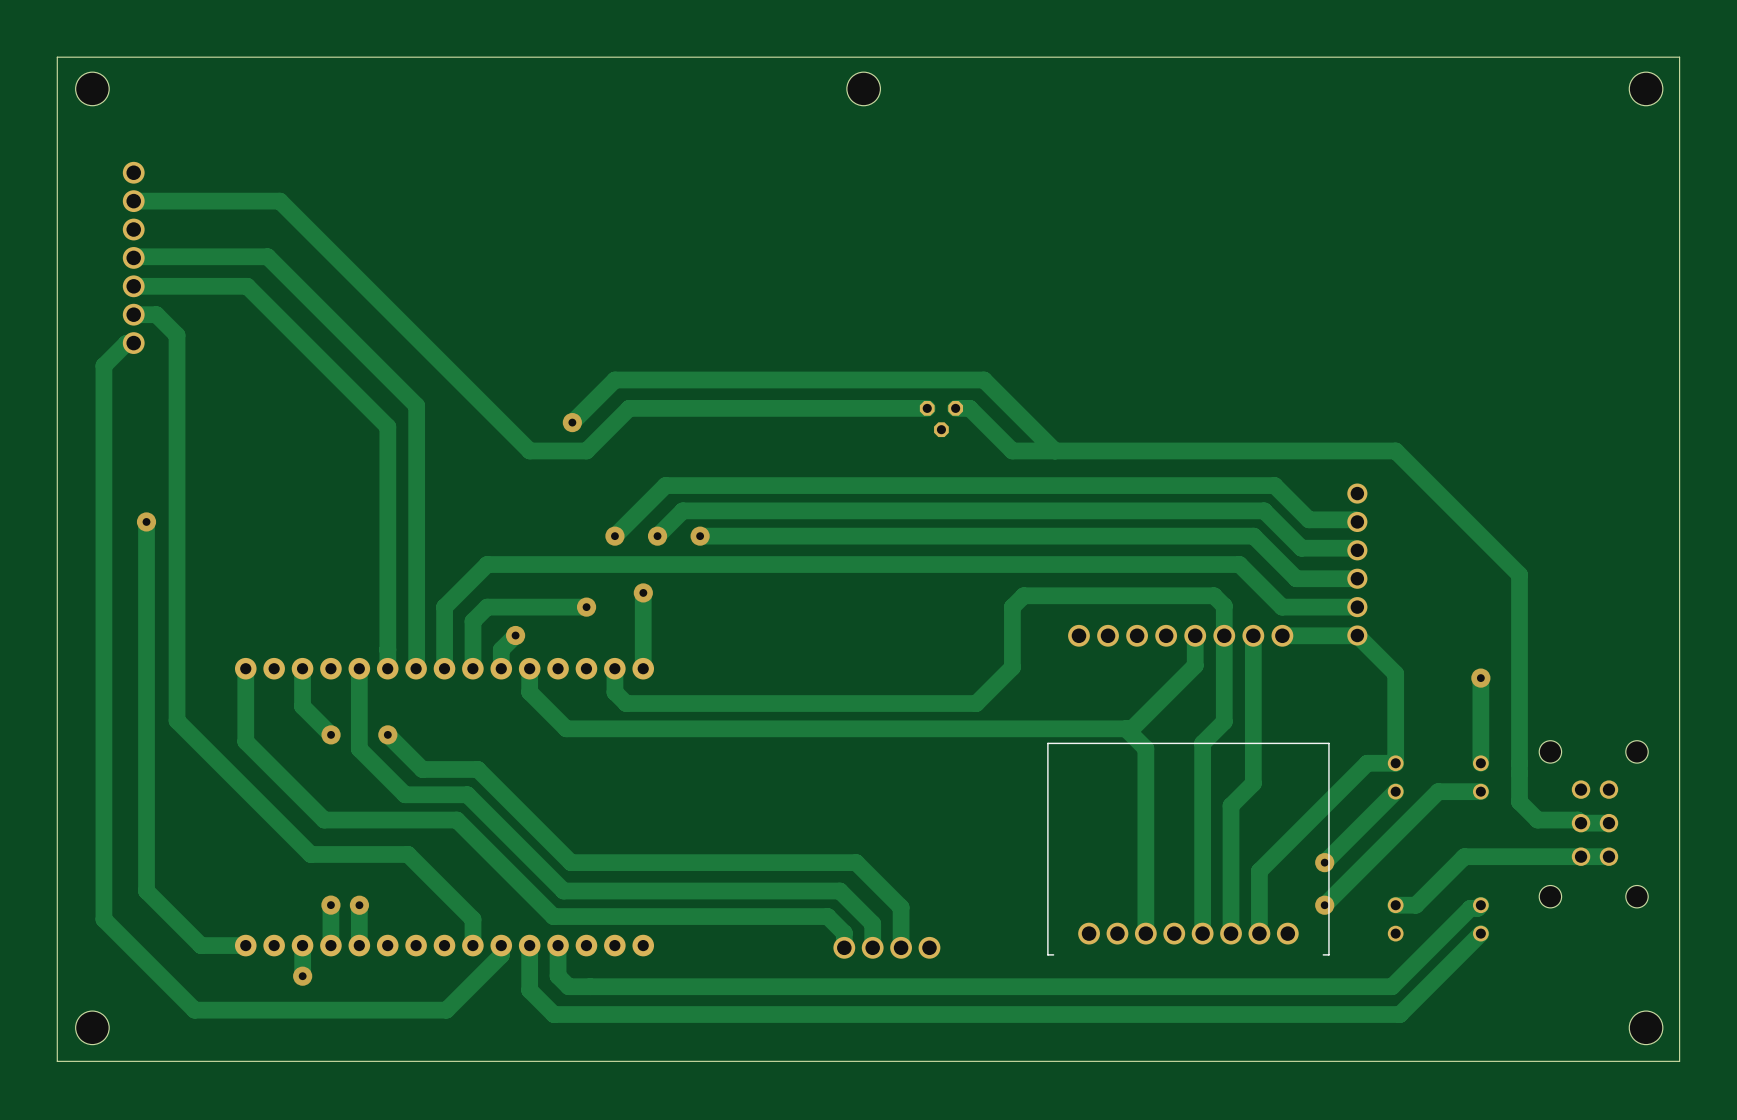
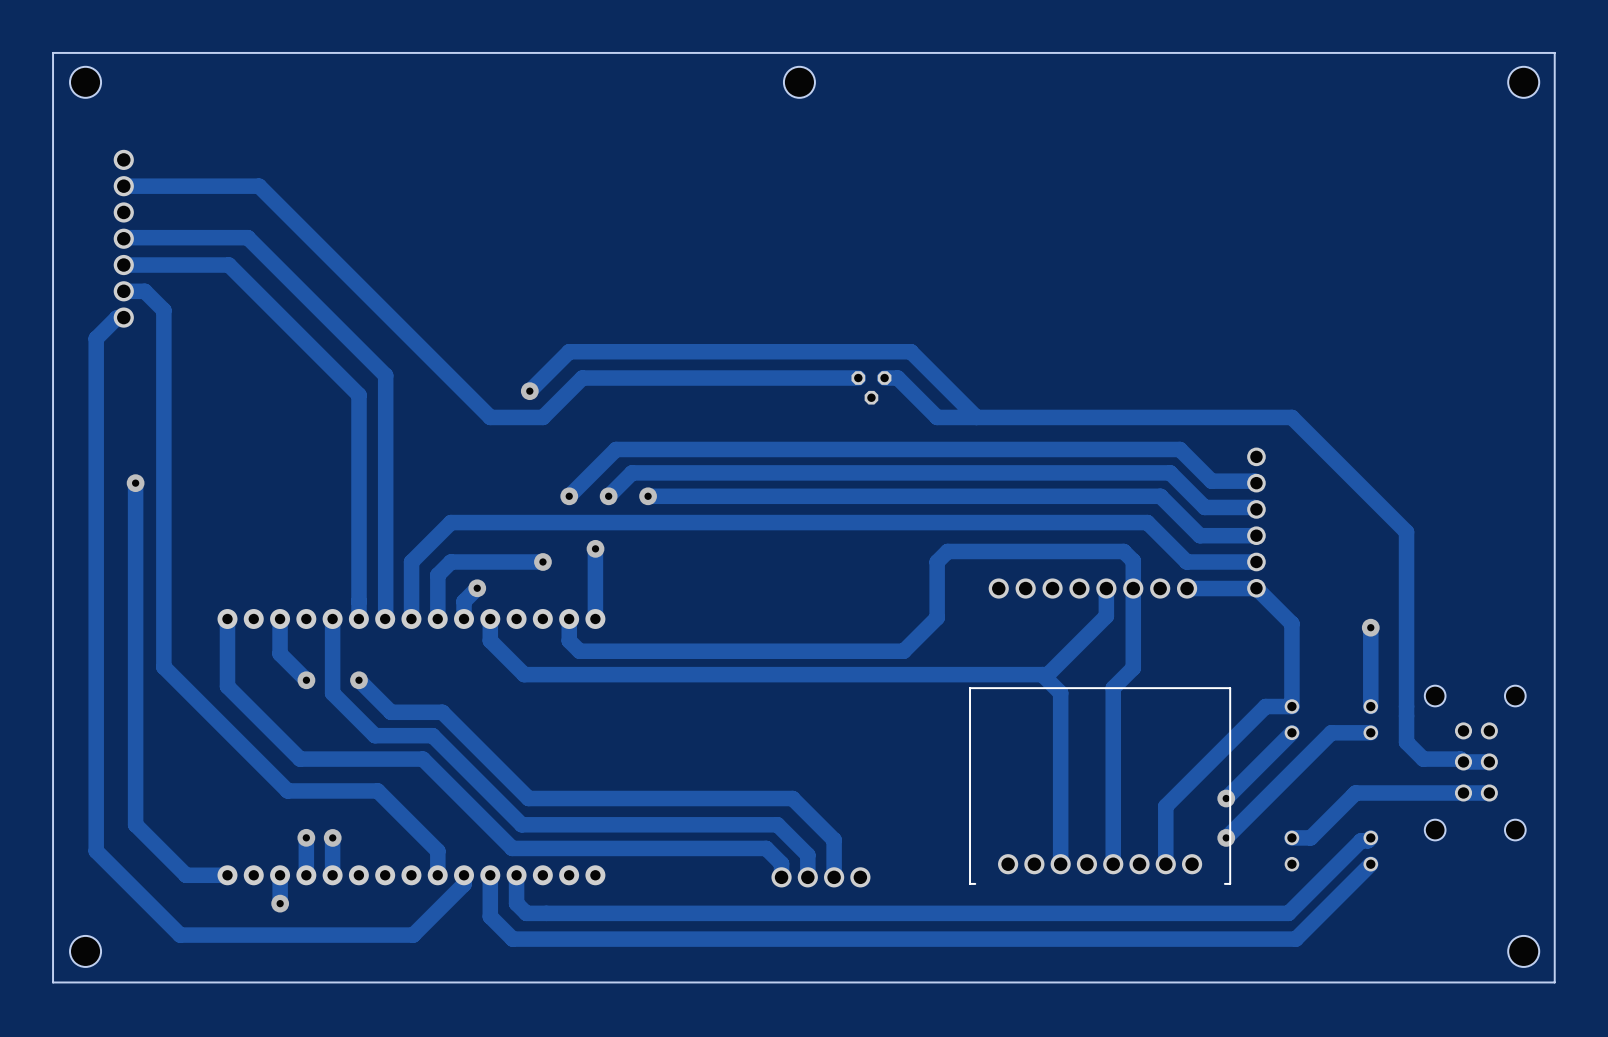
track: (1253, 635) (1253, 783) (1231, 805) (1231, 933) -> none

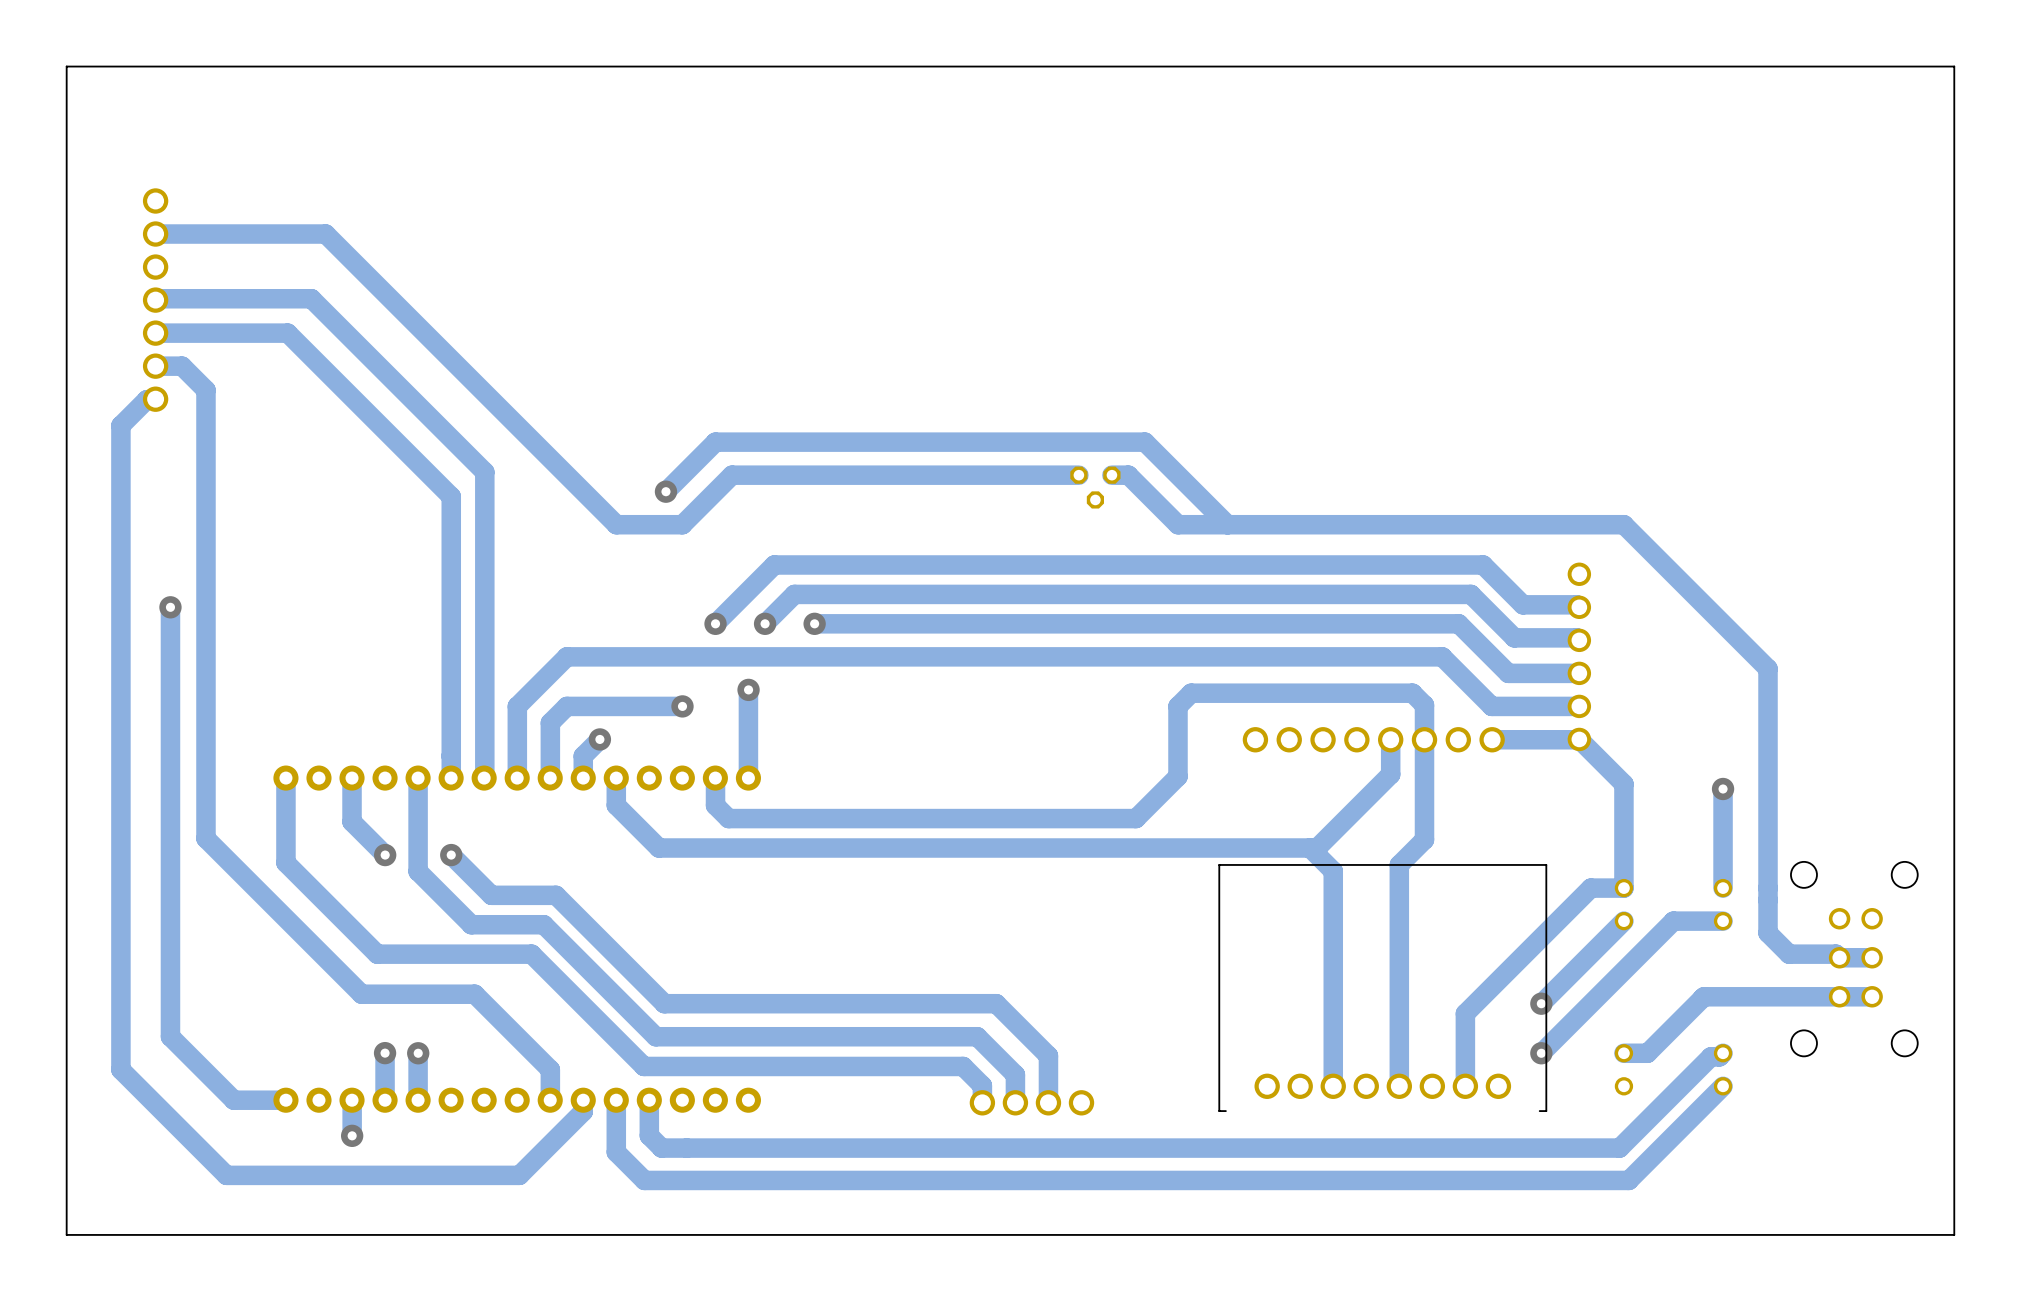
hole: (85, 82) -> none
hole: (799, 82) -> none
hole: (1523, 82) -> none
hole: (85, 951) -> none
hole: (1523, 951) -> none

